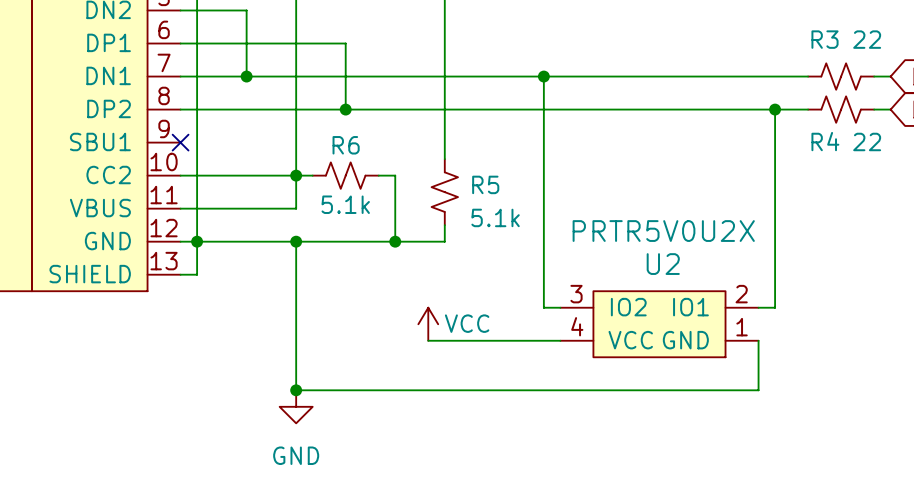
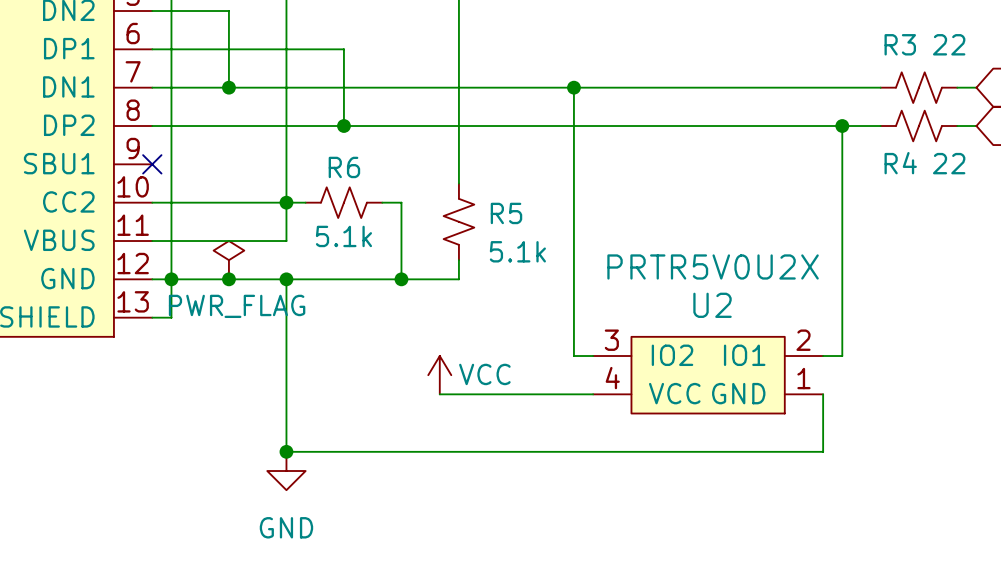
power symbol: none -> PWR_FLAG (228, 260)
junction: none -> (228, 279)

